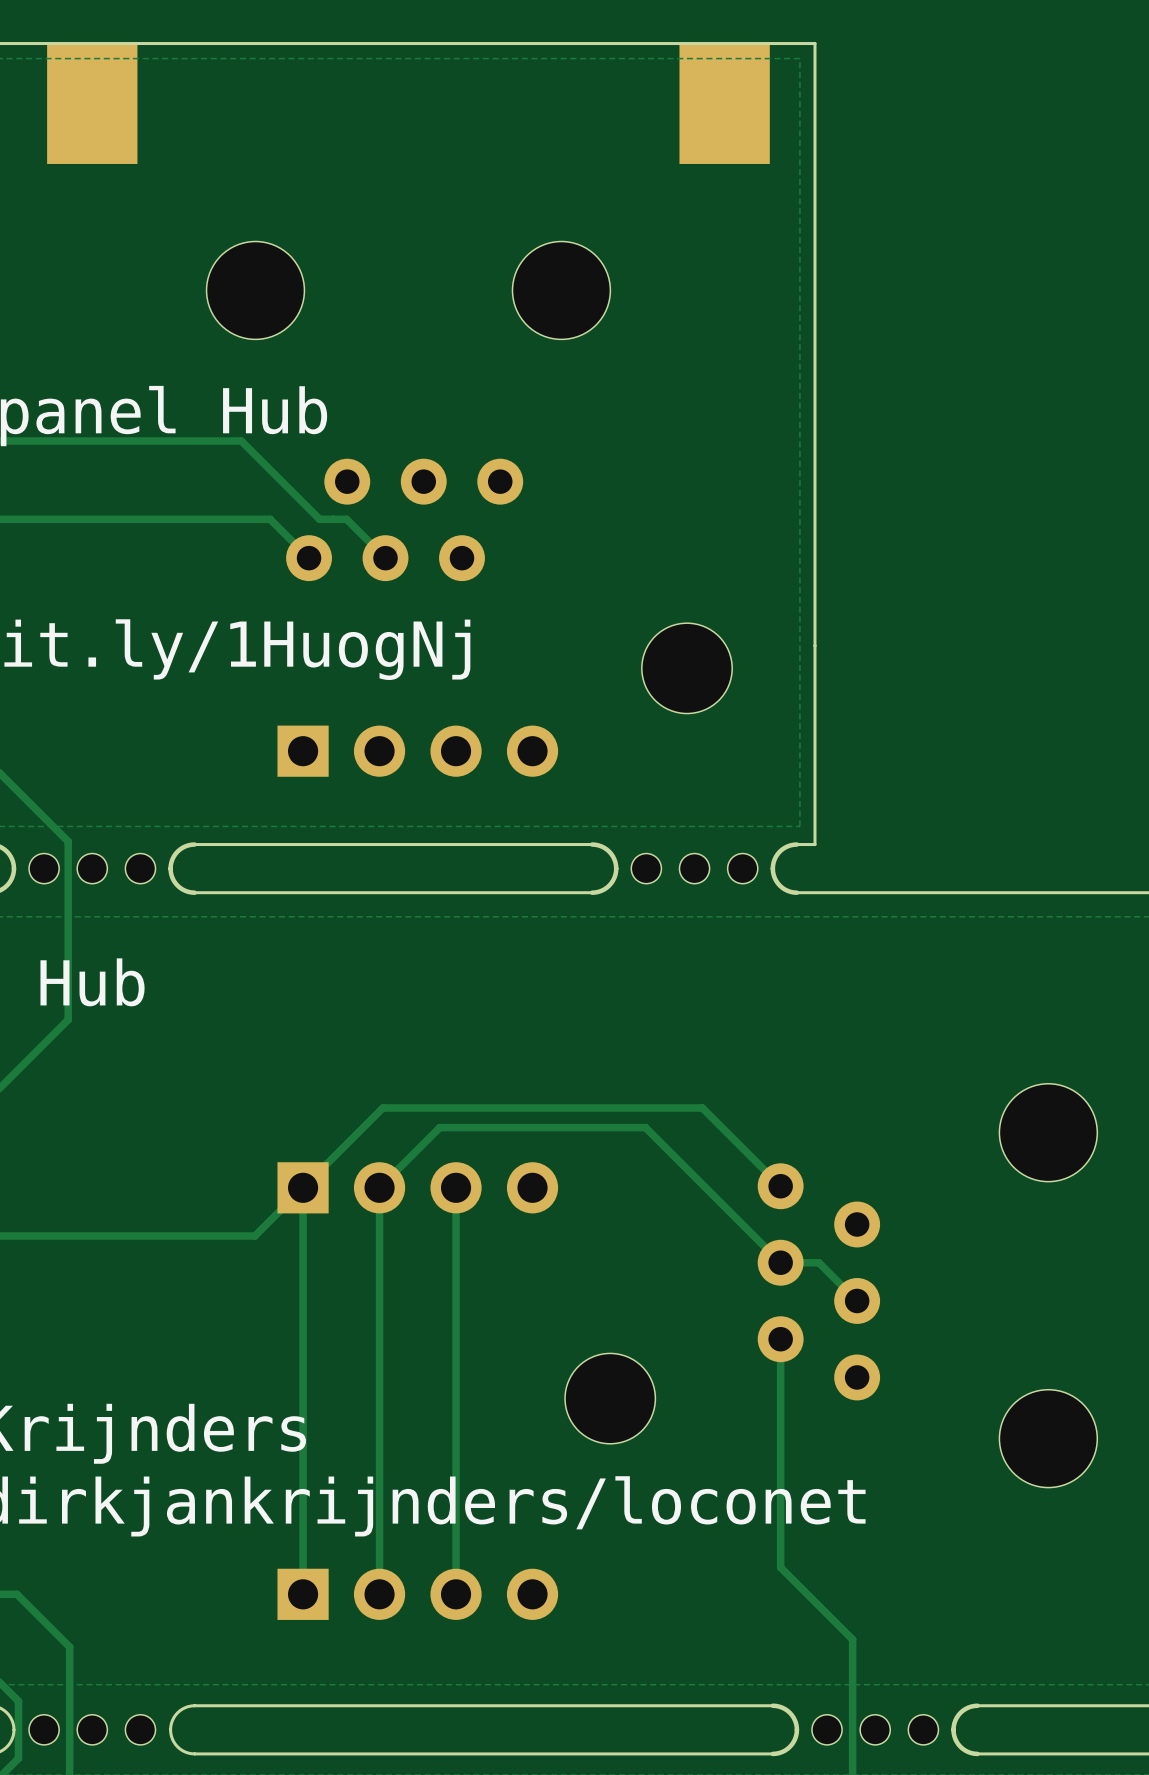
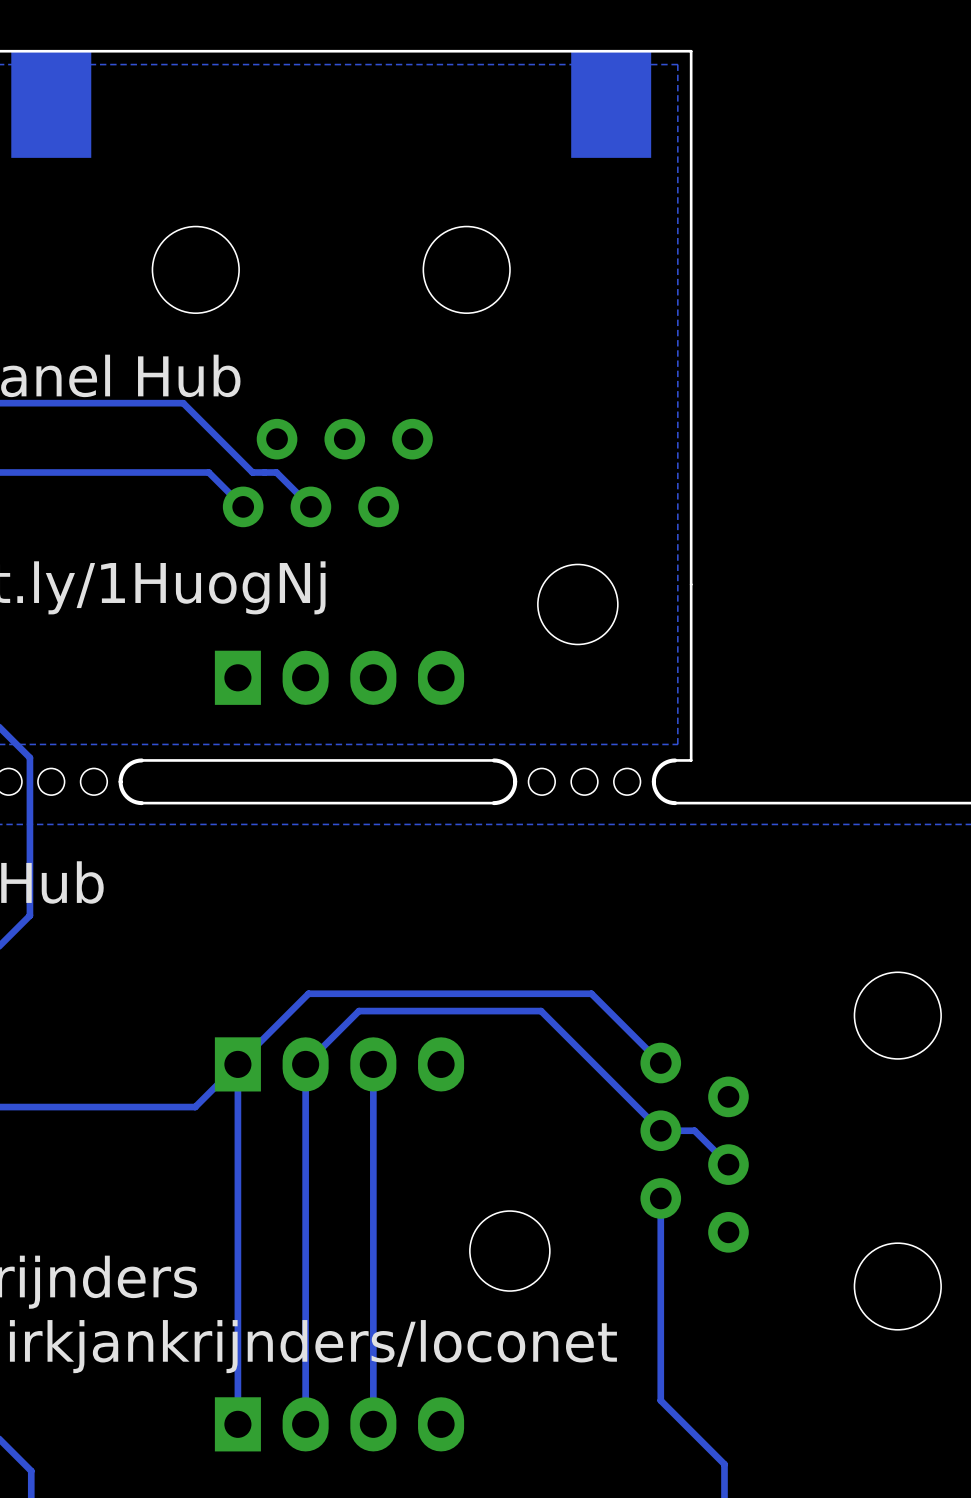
part footprint: [277, 725, 559, 777] -> [214, 650, 465, 705]
part footprint: [277, 1162, 559, 1214] -> [214, 1037, 465, 1092]
part footprint: [277, 1568, 559, 1620] -> [214, 1397, 465, 1452]

